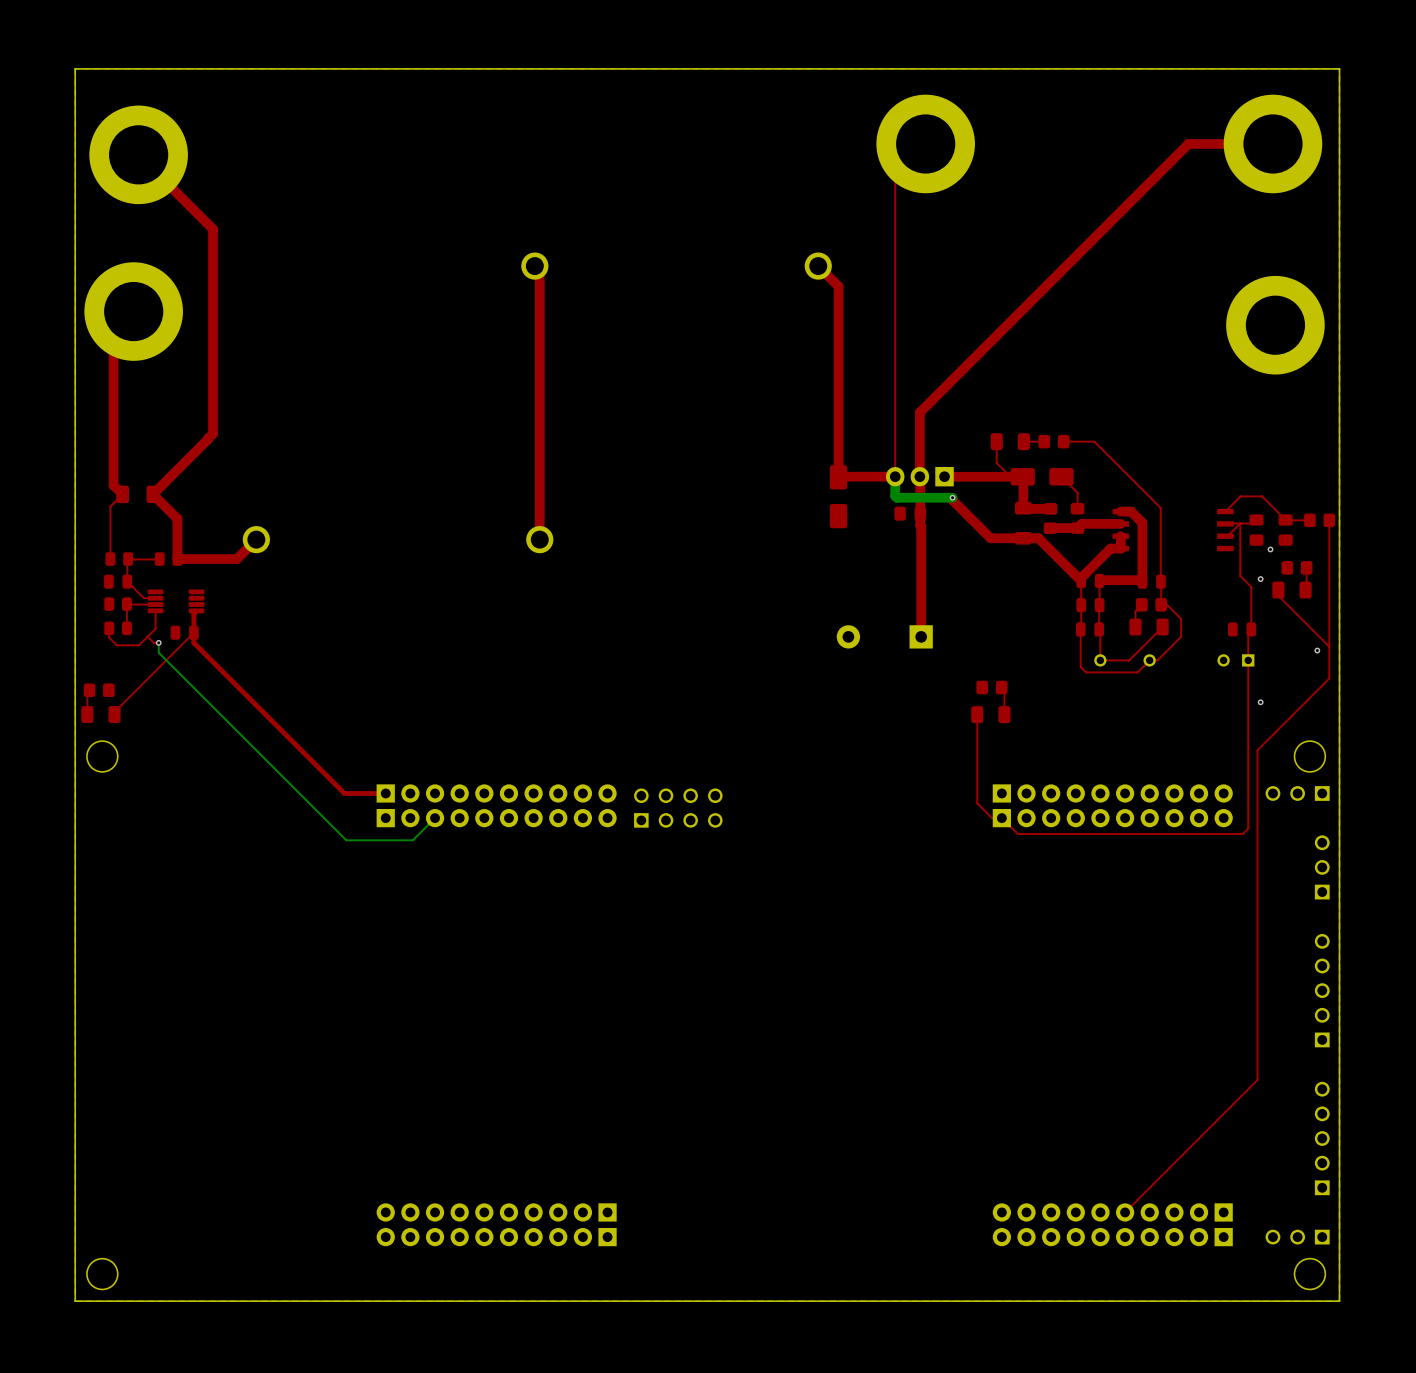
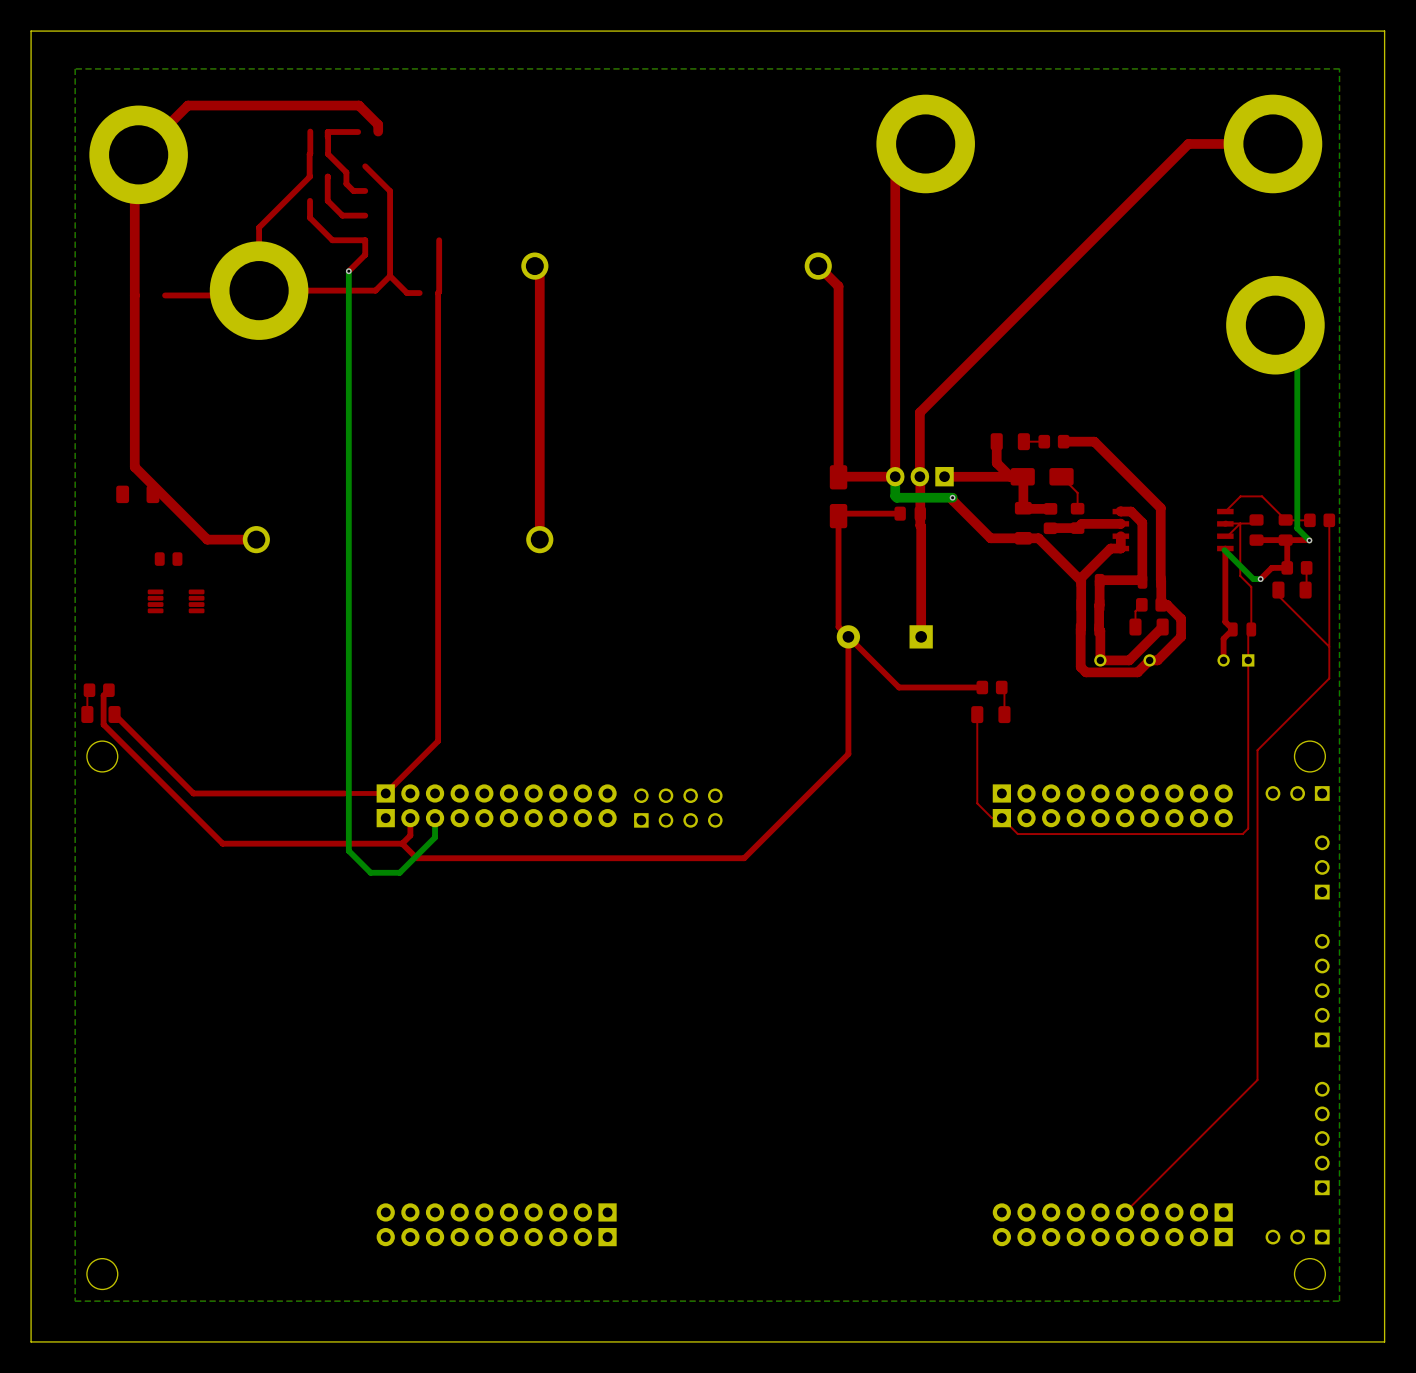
board edge: (1339, 68) (75, 68) (75, 1301) (1339, 1301) (1339, 68) -> (1384, 31) (1384, 1341) (31, 1341) (31, 31) (1384, 31)
top track: none -> (310, 131) (310, 176) (259, 227) (259, 295) (165, 295)
top track: none -> (358, 132) (327, 132) (328, 154) (346, 172) (346, 183) (353, 190) (365, 190)
top track width: thin (925, 143) (895, 174) (895, 476) -> thick (925, 143) (895, 174) (895, 476)
top track: (138, 154) (213, 229) (213, 433) (152, 494) (177, 518) (177, 559) (236, 559) (256, 539) -> (378, 131) (378, 124) (358, 105) (187, 105) (134, 158) (134, 467) (207, 539) (256, 539)
top track: none -> (365, 166) (390, 191) (390, 276)
top track: none -> (328, 177) (327, 200) (342, 215) (365, 215)
top track: none -> (310, 200) (310, 217) (332, 240) (365, 240) (365, 254) (348, 271)
top track: none -> (439, 240) (438, 741) (385, 793)
via: none -> (348, 271)
top track: none -> (390, 276) (375, 290) (259, 290)
top track: none -> (390, 276) (407, 293) (419, 293)
top track: (133, 311) (113, 331) (113, 485) (122, 494) (110, 506) (110, 559) -> none
part position: (133, 311) -> (259, 290)
bottom track: none -> (1275, 325) (1297, 347) (1297, 528) (1309, 540)
top track width: thin (996, 441) (996, 463) (1010, 476) -> thick (996, 441) (996, 463) (1010, 476)
top track width: thin (1063, 441) (1094, 441) (1160, 508) (1161, 604) (1167, 604) (1181, 618) (1181, 636) (1157, 660) (1149, 660) (1137, 672) (1086, 672) (1080, 667) (1081, 577) -> thick (1063, 441) (1094, 441) (1160, 508) (1161, 604) (1167, 604) (1181, 618) (1181, 636) (1157, 660) (1149, 660) (1137, 672) (1086, 672) (1080, 667) (1081, 577)
top track: none -> (900, 513) (841, 513) (838, 516) (838, 627) (899, 687) (982, 687)
top track: none -> (1256, 540) (1309, 540)
top track: none -> (1285, 540) (1287, 567) (1271, 567) (1260, 579)
top track: none -> (1225, 548) (1225, 621) (1232, 629) (1223, 638) (1223, 660)
via position: (1270, 549) -> (1309, 540)
bottom track: none -> (1224, 550) (1253, 579) (1260, 579)
part: (119, 559) -> none
top track: (157, 559) (126, 559) (127, 581) (143, 598) (155, 598) -> none
top track width: thin (1102, 580) (1099, 580) (1100, 660) (1129, 660) (1162, 627) -> thick (1102, 580) (1099, 580) (1100, 660) (1129, 660) (1162, 627)
part: (118, 581) -> none
part: (118, 604) -> none
top track: (155, 604) (126, 604) (126, 628) -> none
top track: (155, 610) (155, 628) (139, 645) (116, 645) (109, 637) (109, 628) -> none
top track: (196, 611) (193, 614) (193, 642) (344, 793) -> (114, 714) (193, 793) (344, 793)
part: (118, 628) -> none
part: (184, 632) -> none
top track: (193, 632) (114, 712) (114, 714) -> none
top track: (147, 636) (153, 642) (158, 642) -> none
top track: none -> (848, 636) (848, 754) (744, 858) (416, 858) (402, 843)
bottom track: (158, 642) (158, 652) (346, 840) (412, 840) (435, 818) -> (348, 271) (348, 850) (370, 872) (399, 872) (435, 837) (435, 818)
via: (158, 642) -> none
via: (1317, 650) -> none
top track: none -> (108, 690) (103, 695) (103, 724) (222, 843) (402, 843)
via: (1260, 702) -> none
top track: none -> (410, 818) (410, 835) (402, 843)

